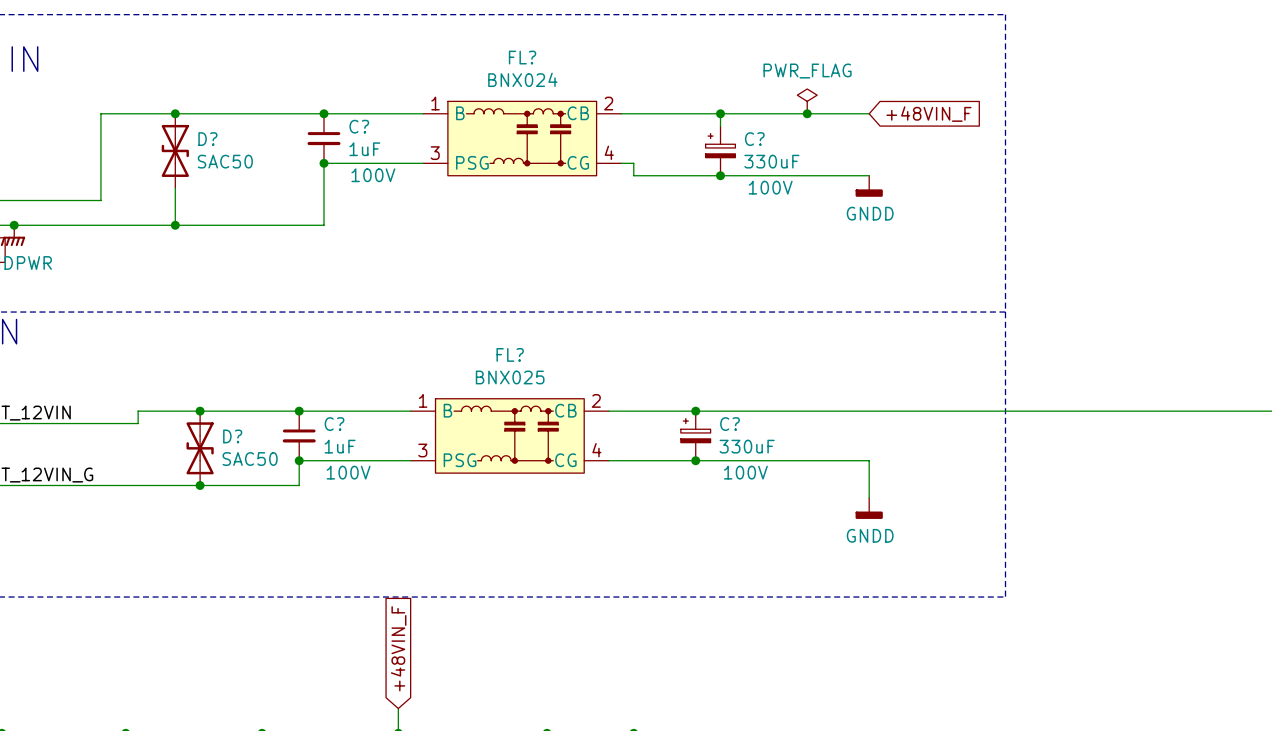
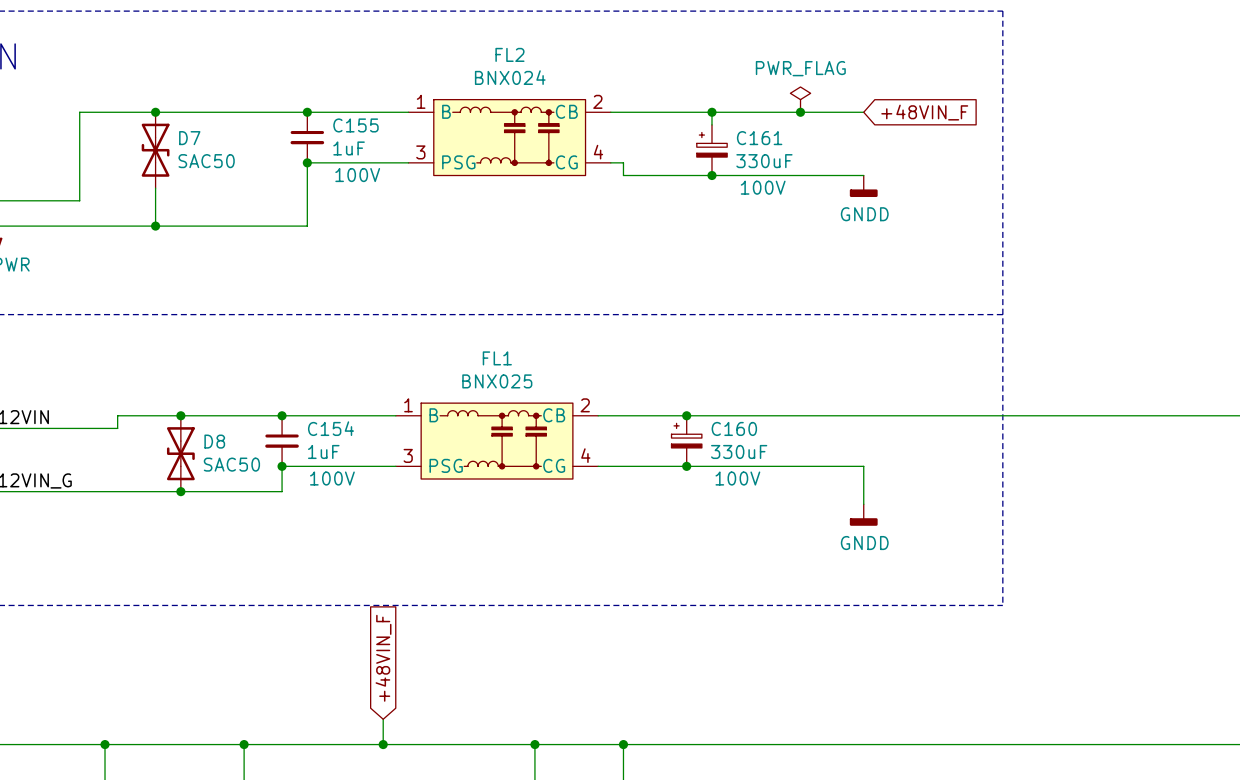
FL? name: FL? (522, 57) -> FL2 (509, 54)
C? name: C? (359, 126) -> C155 (355, 125)
D? name: D? (207, 139) -> D7 (189, 138)
C? name: C? (754, 139) -> C161 (759, 138)
FL? name: FL? (510, 354) -> FL1 (497, 358)
C? name: C? (334, 424) -> C154 (330, 428)
C? name: C? (730, 424) -> C160 (734, 428)
D? name: D? (232, 436) -> D8 (214, 441)

